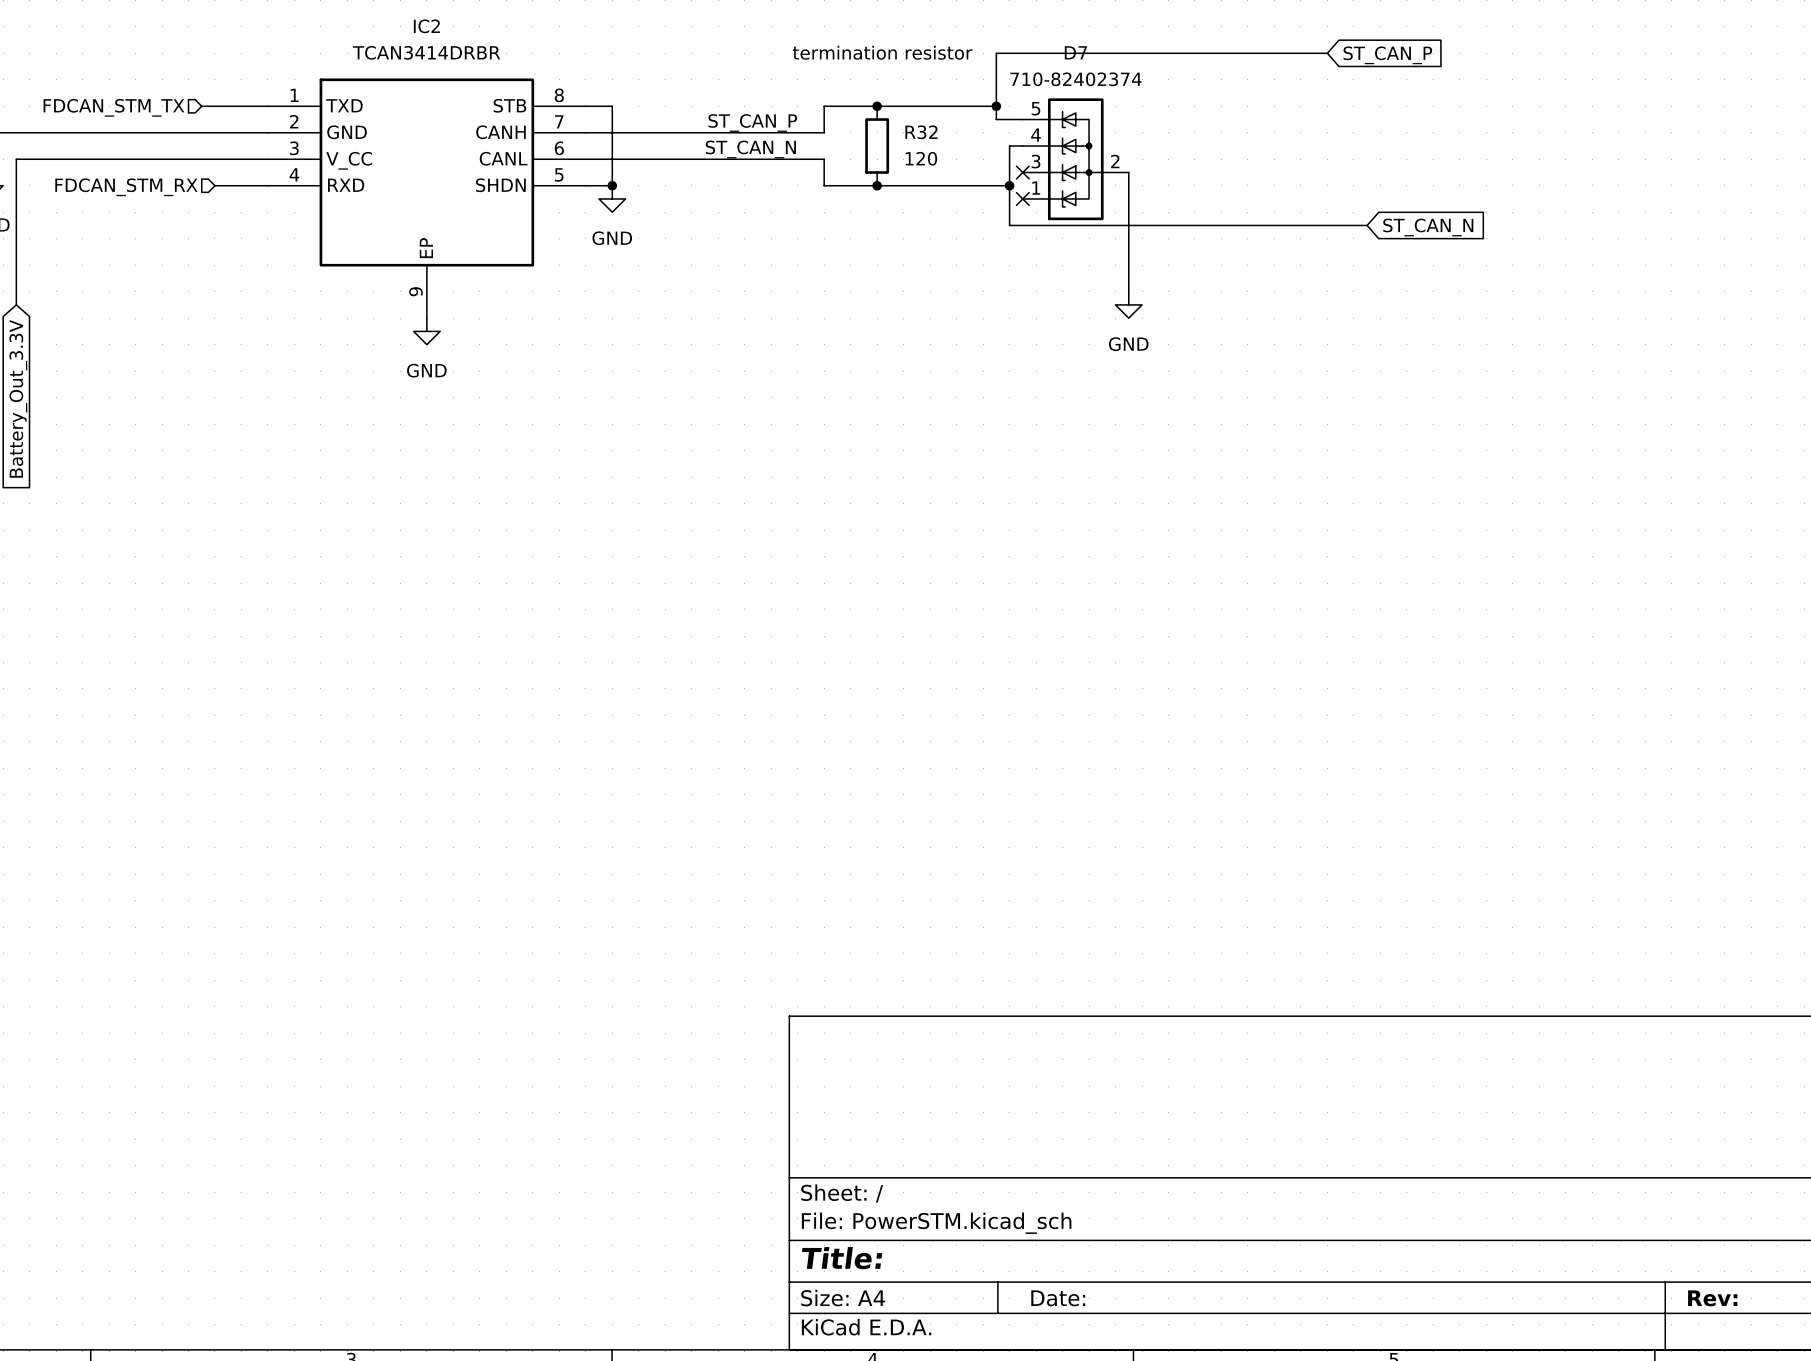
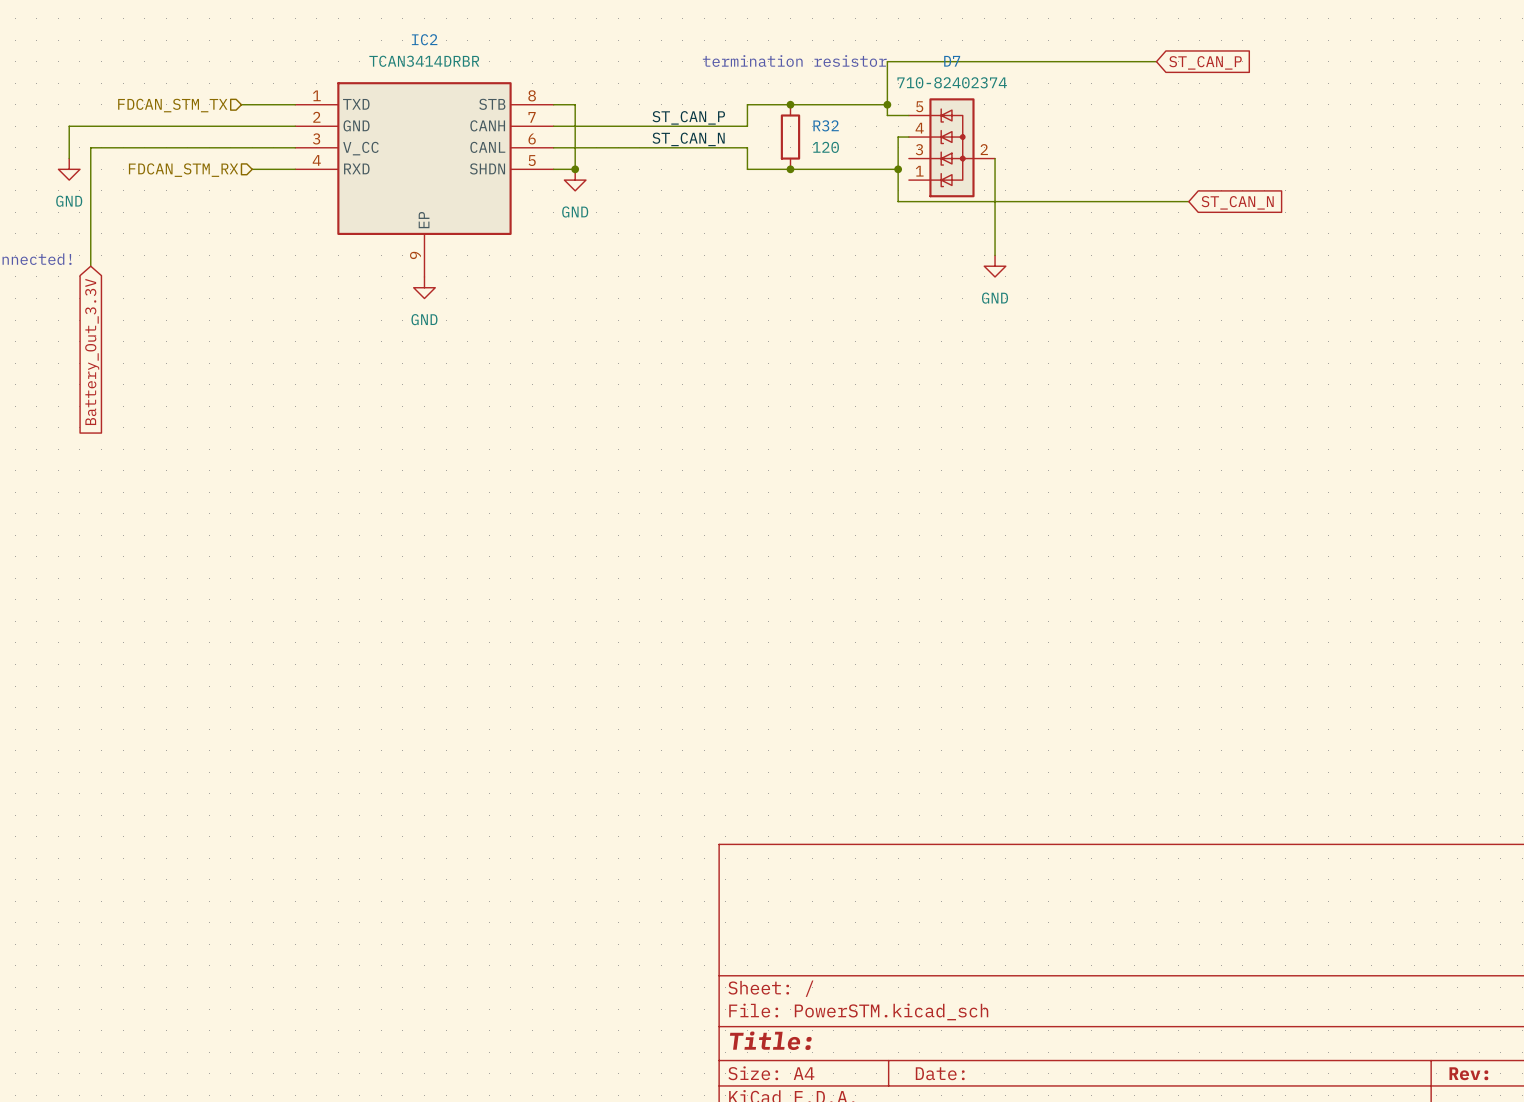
no-connect mark: (1022, 172) -> none
no-connect mark: (1022, 198) -> none

